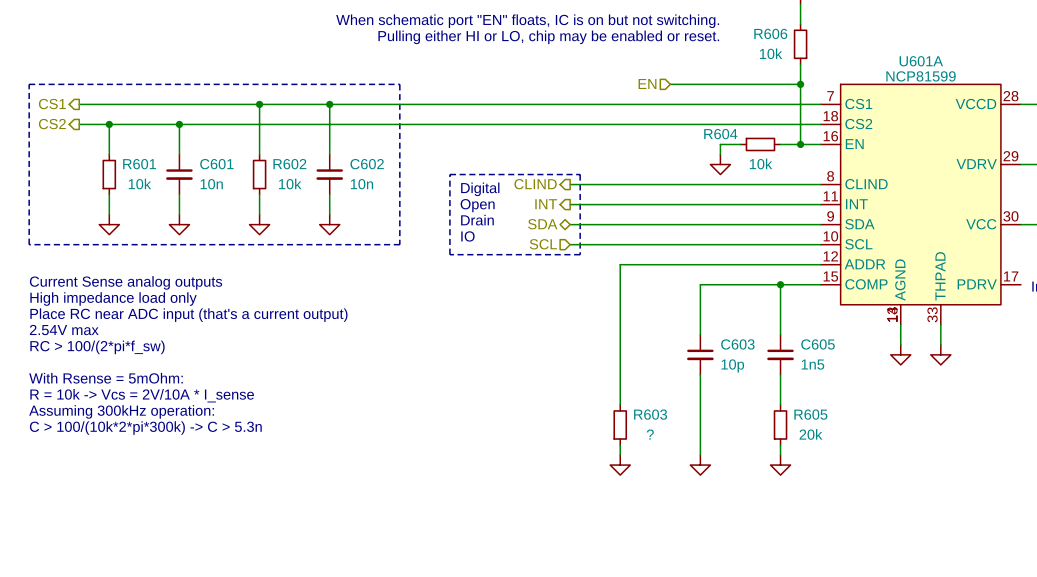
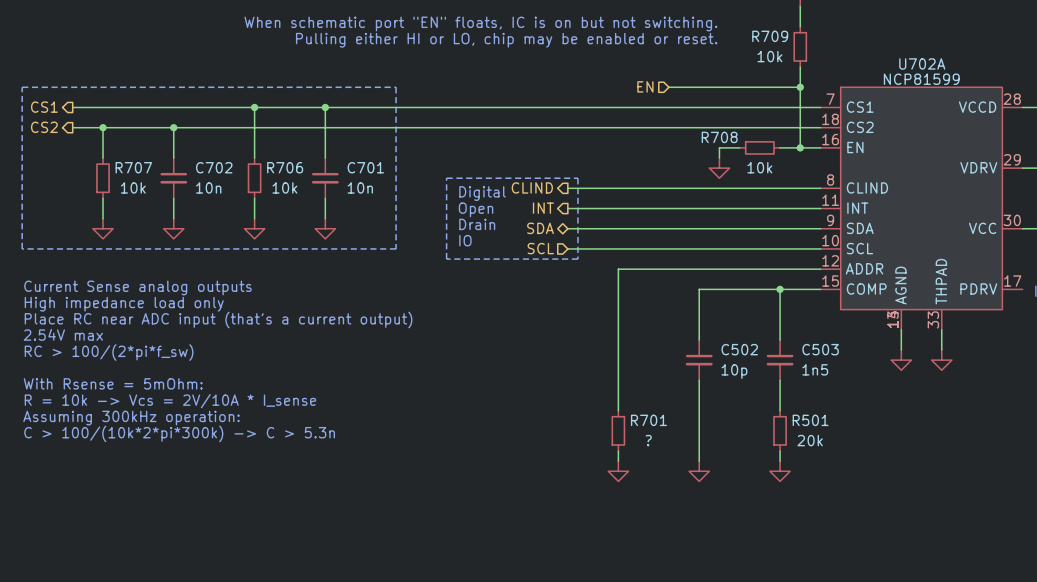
R606 name: R606 (770, 33) -> R709 (770, 36)
U601A name: U601A (921, 61) -> U702A (922, 63)
R604 name: R604 (720, 134) -> R708 (719, 137)
R601 name: R601 (139, 164) -> R707 (133, 167)
C601 name: C601 (216, 164) -> C702 (214, 167)
R602 name: R602 (289, 164) -> R706 (285, 167)
C602 name: C602 (367, 164) -> C701 (365, 167)
C603 name: C603 (737, 344) -> C502 (739, 349)
C605 name: C605 (818, 344) -> C503 (820, 349)
R603 name: R603 (650, 414) -> R701 (648, 420)
R605 name: R605 (810, 414) -> R501 (810, 420)

